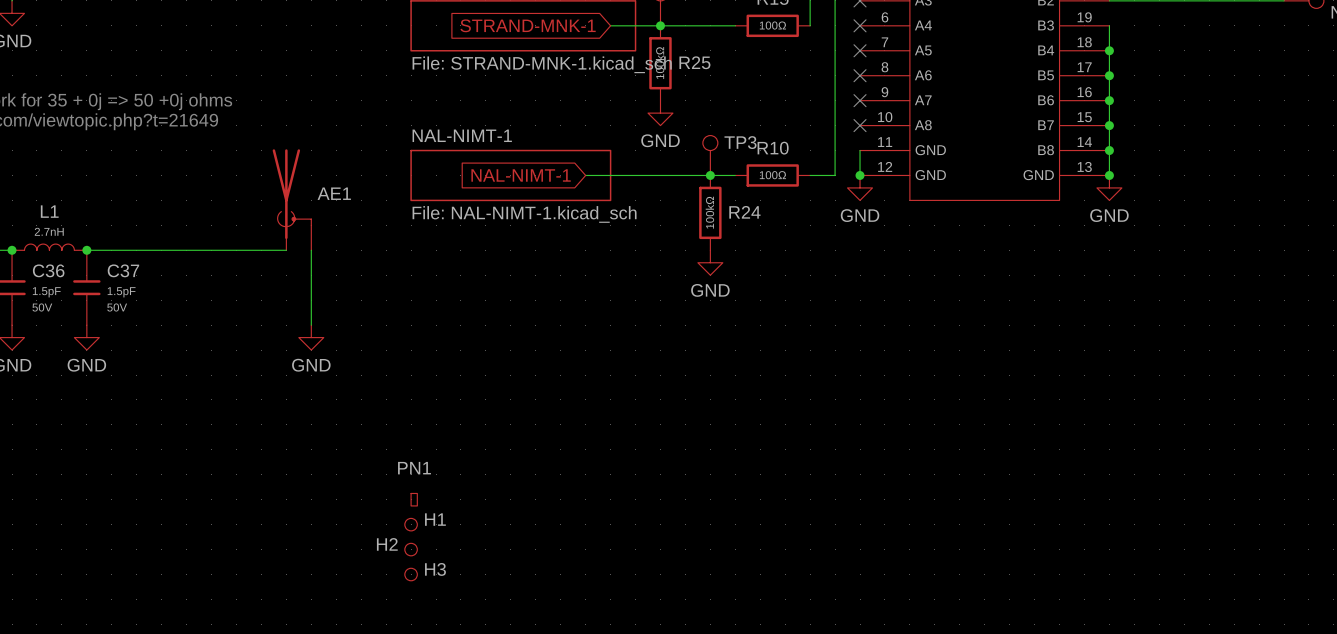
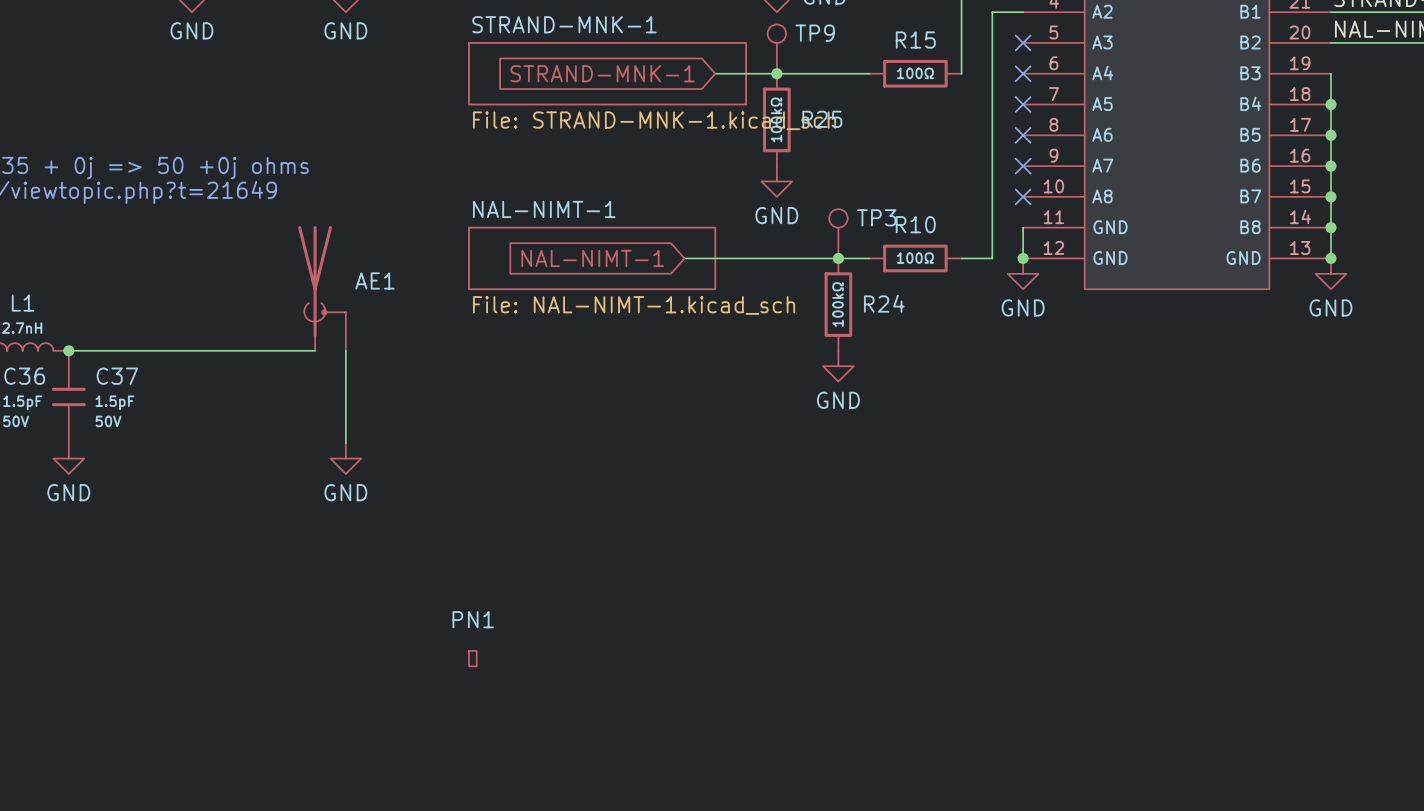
H1: (411, 524) -> none
H2: (411, 549) -> none
H3: (411, 574) -> none

